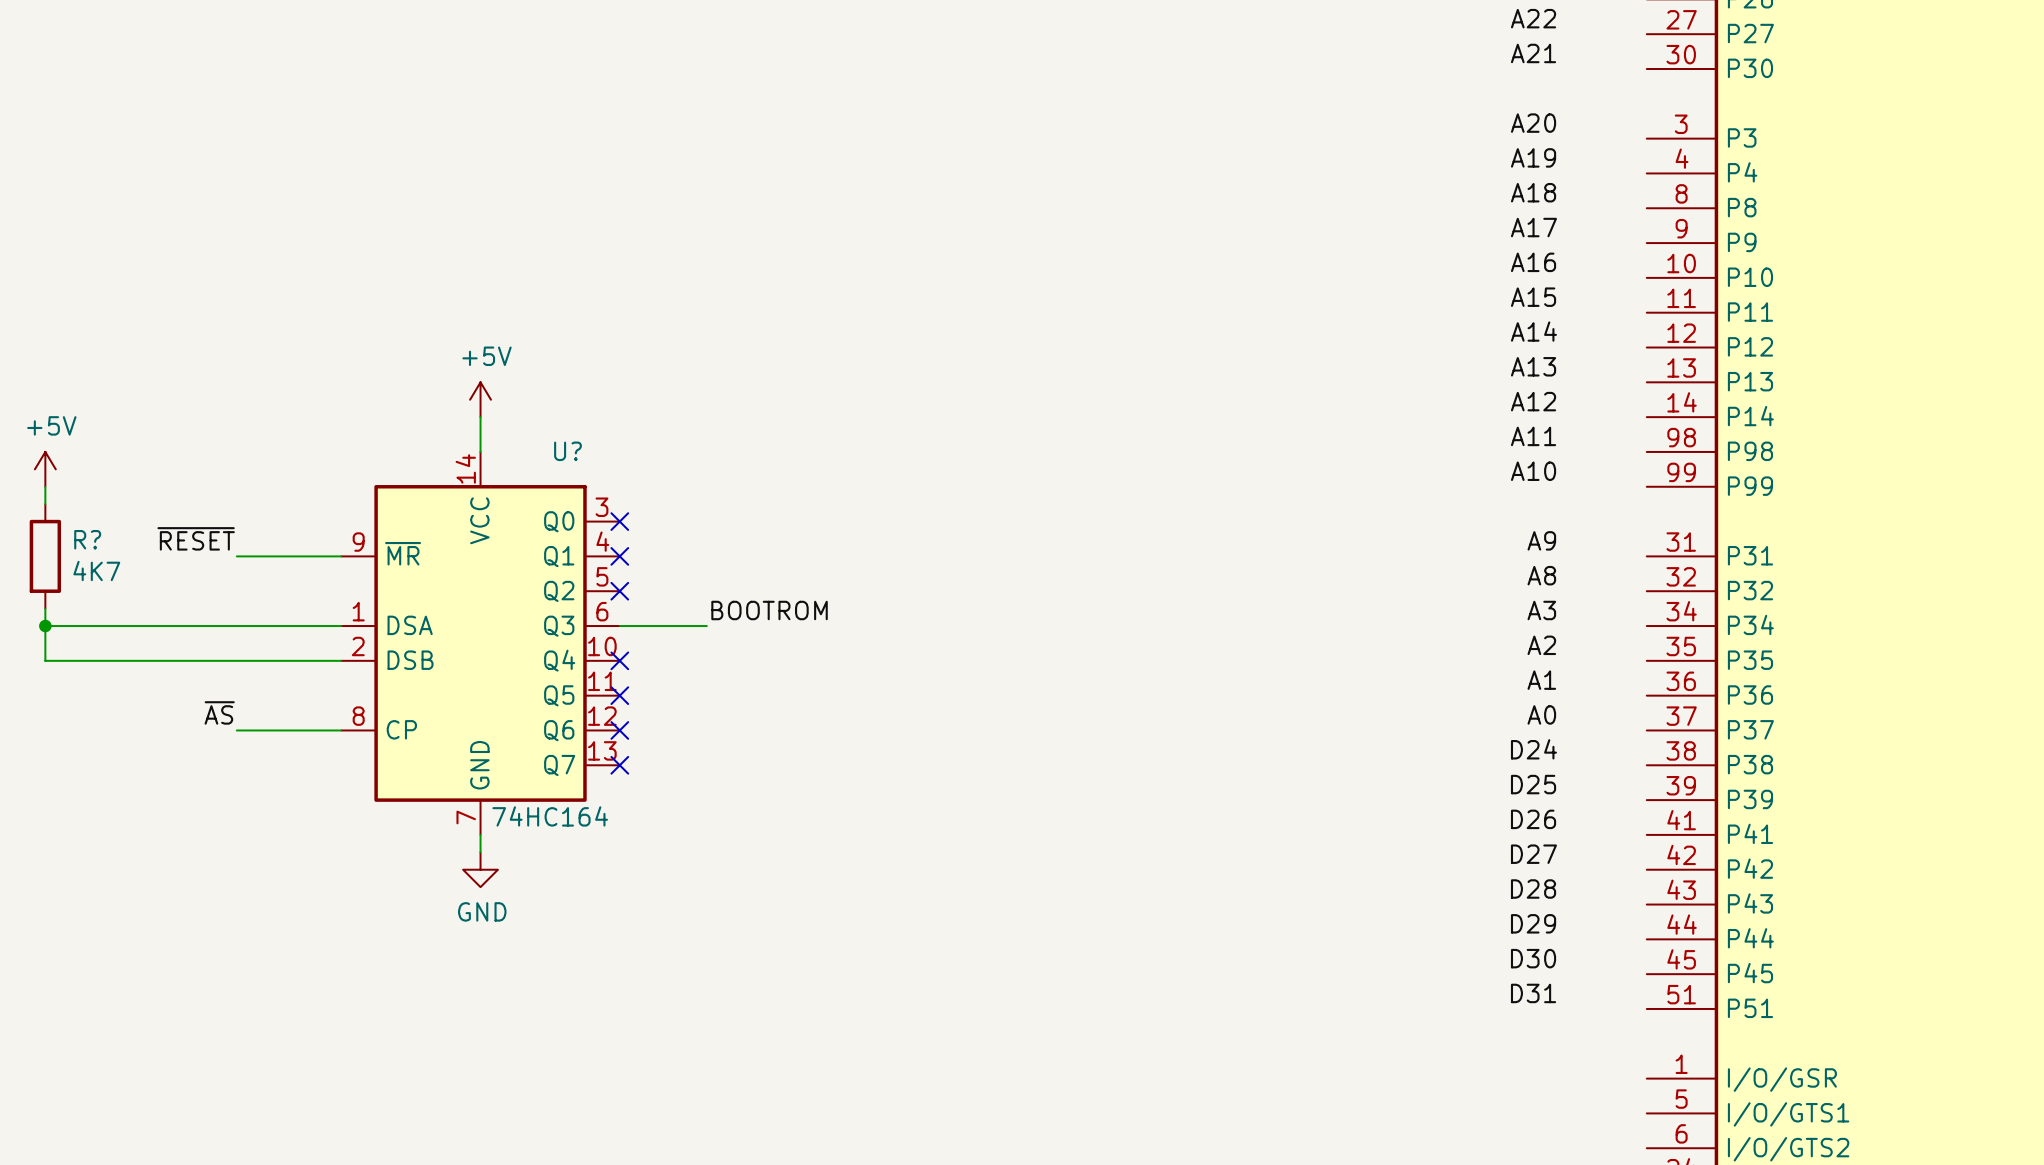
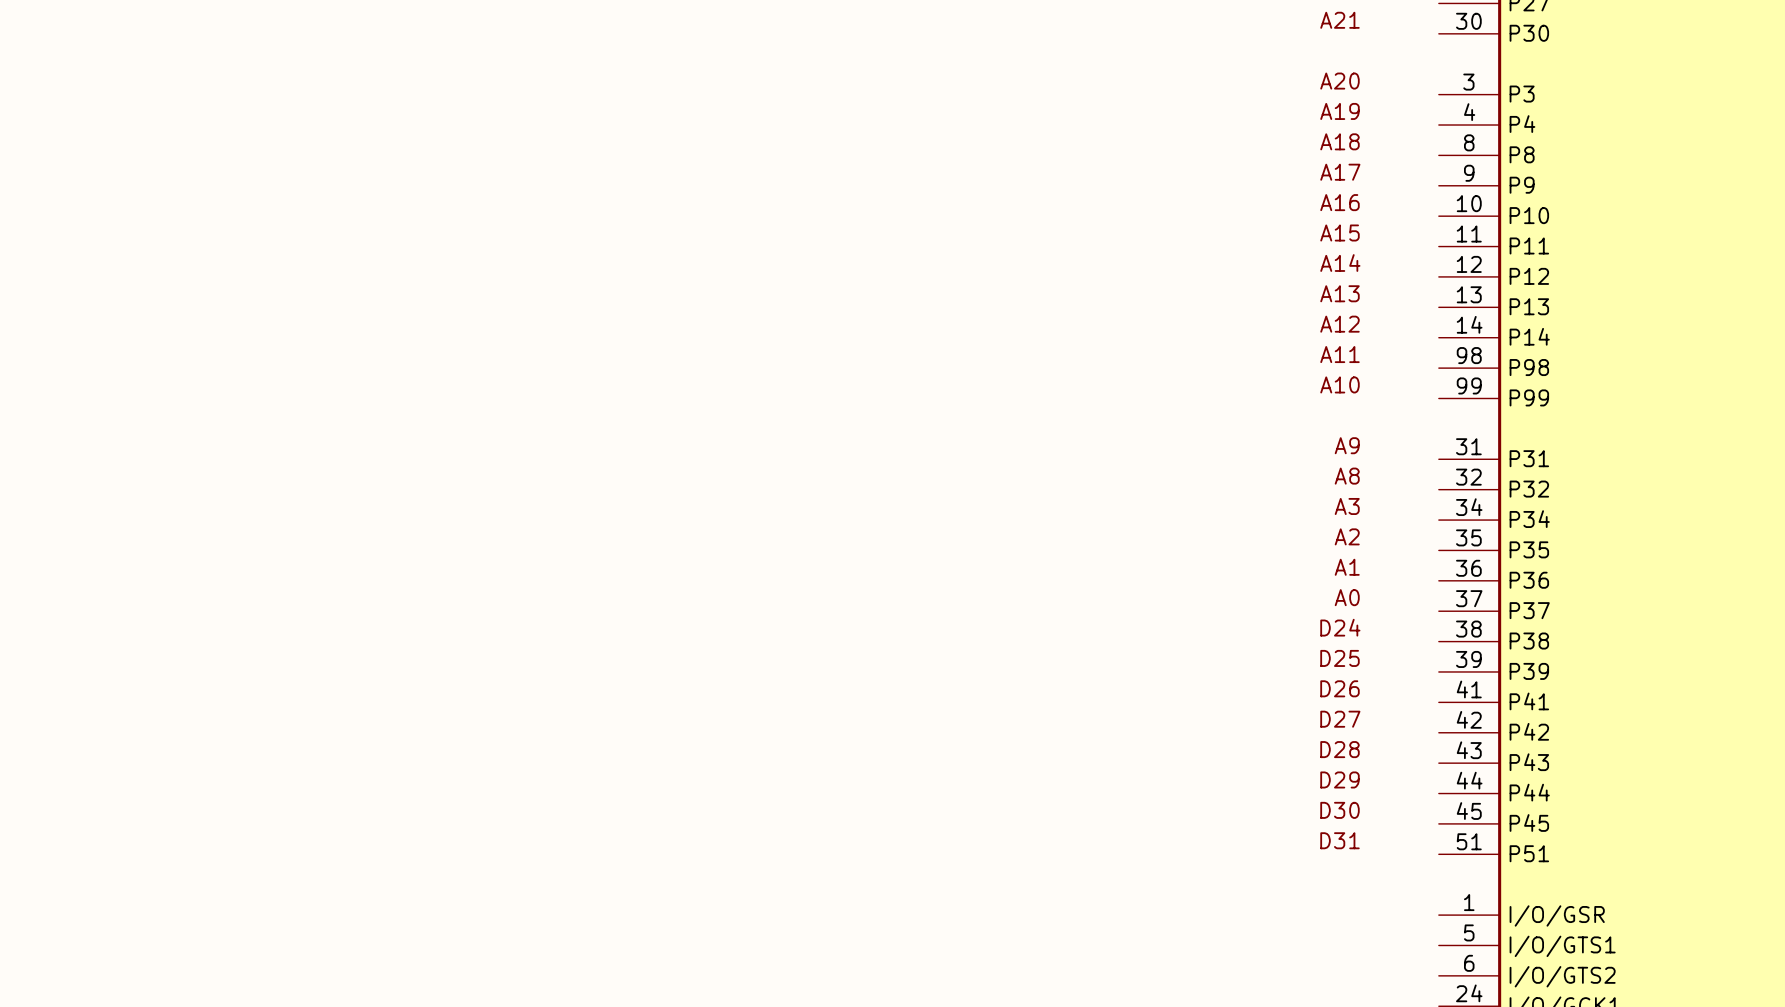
power symbol: +5V (480, 399) -> none
wire: (480, 417) (480, 451) -> none
power symbol: +5V (45, 469) -> none
wire: (45, 486) (45, 504) -> none
no-connect mark: (619, 521) -> none
label: ~{RESET} (196, 538) -> none
R?: 4K7 (45, 556) -> none
wire: (236, 556) (341, 556) -> none
no-connect mark: (619, 556) -> none
no-connect mark: (619, 591) -> none
wire: (45, 608) (45, 660) (341, 660) -> none
label: BOOTROM (769, 610) -> none
wire: (45, 626) (341, 626) -> none
junction: (45, 626) -> none
wire: (619, 626) (706, 626) -> none
U?: 74HC164 (480, 643) -> none
no-connect mark: (619, 660) -> none
no-connect mark: (619, 695) -> none
label: ~{AS} (219, 712) -> none
wire: (236, 730) (341, 730) -> none
no-connect mark: (619, 730) -> none
no-connect mark: (619, 765) -> none
wire: (480, 834) (480, 852) -> none
power symbol: GND (480, 869) -> none

